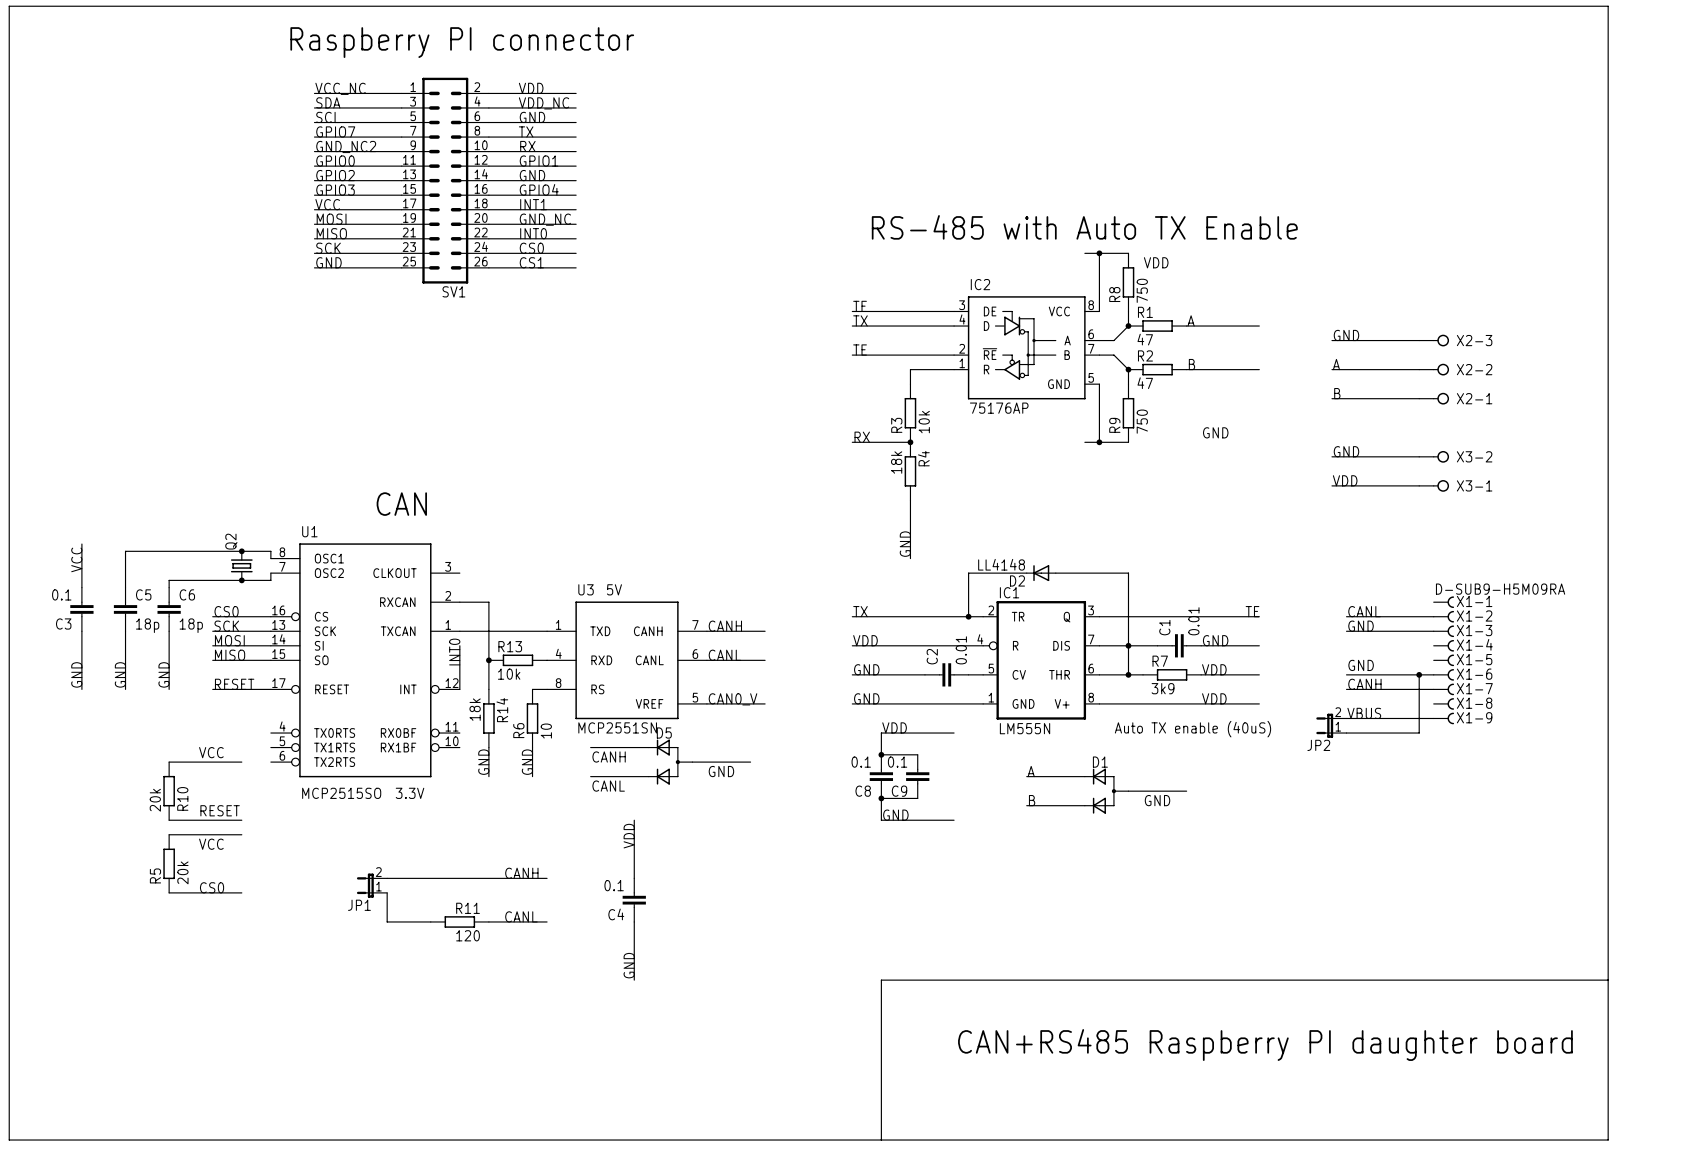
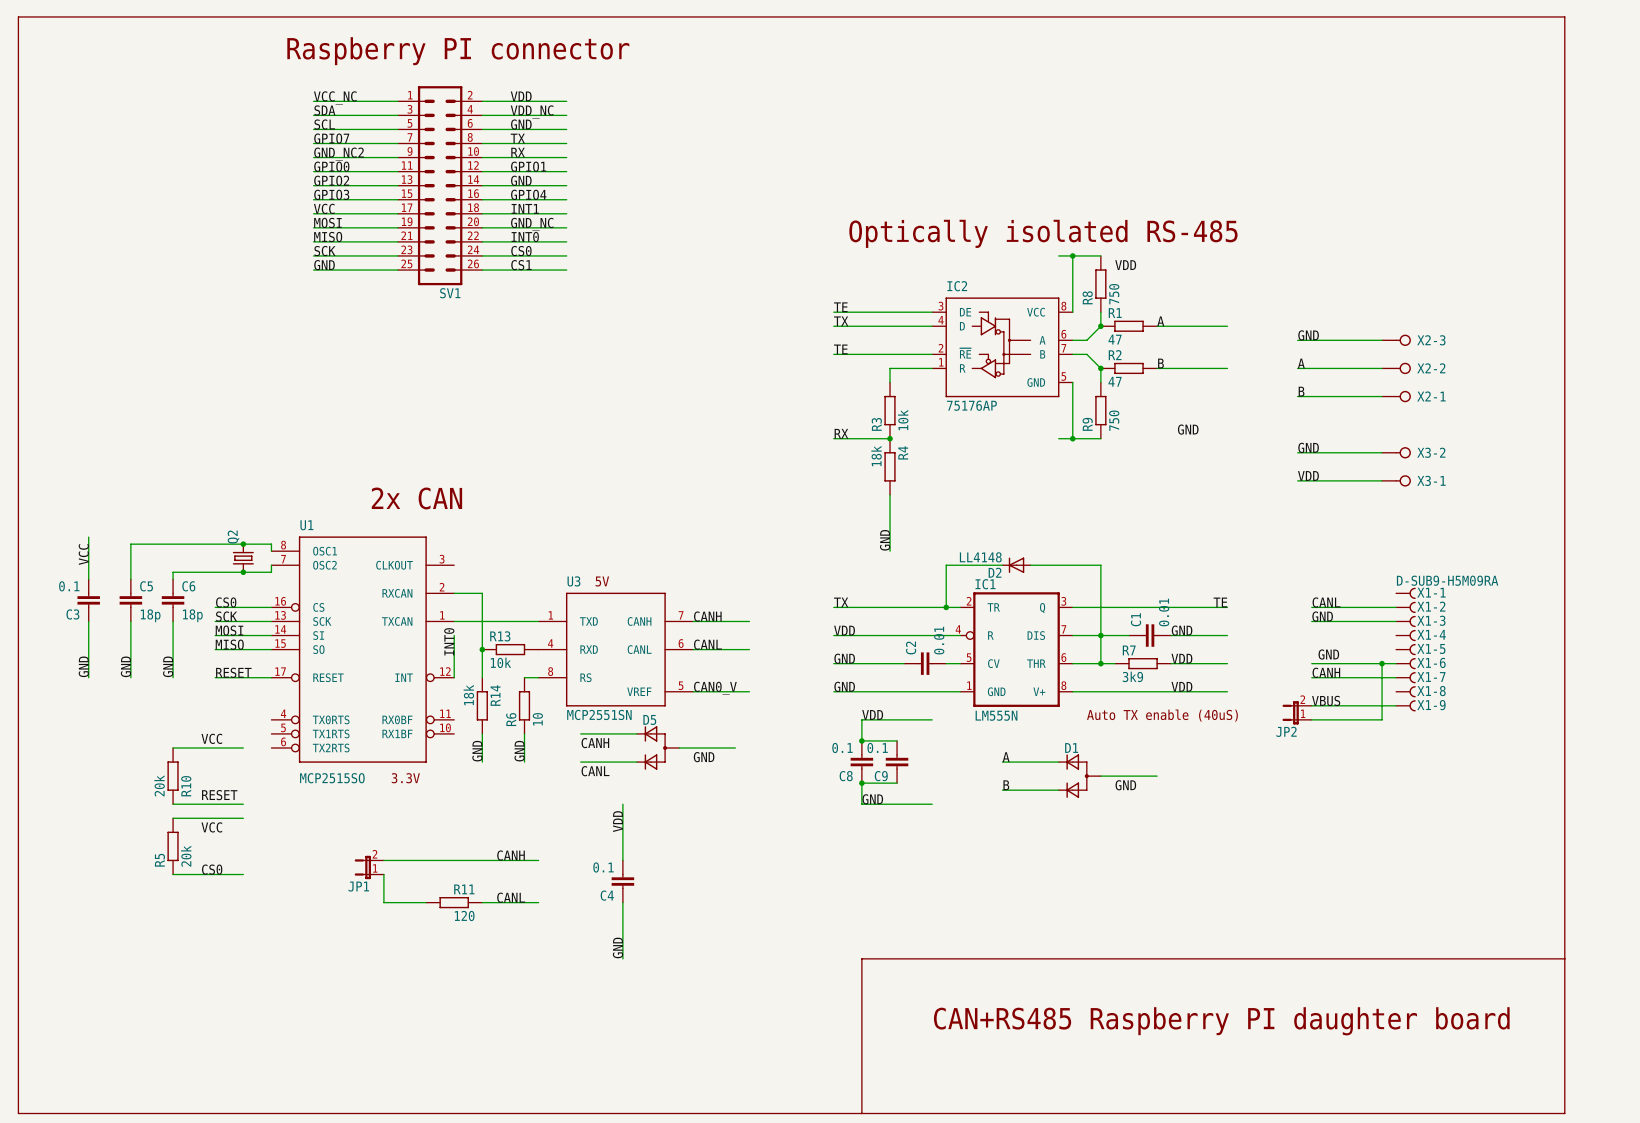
text: RS-485 with Auto TX Enable (1084, 227) -> Optically isolated RS-485 (1043, 233)
text: CAN (401, 504) -> 2x CAN (416, 498)

